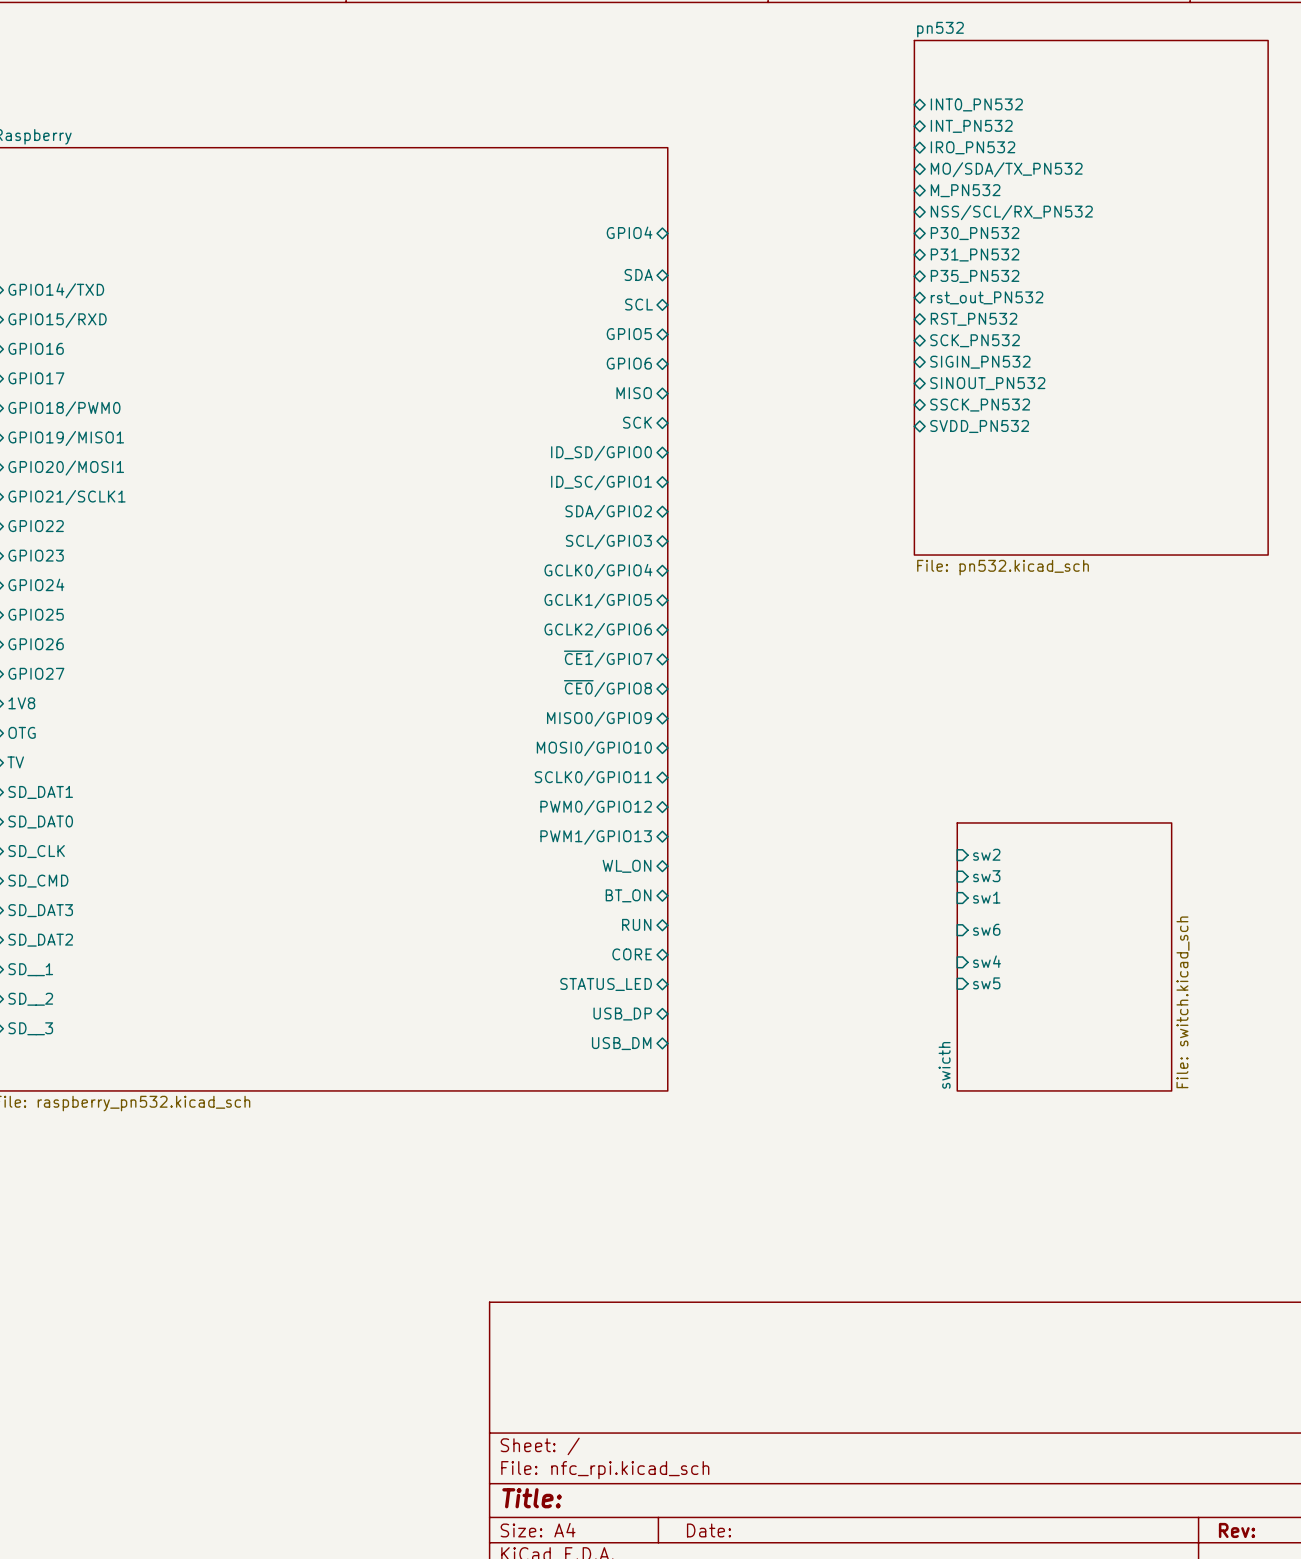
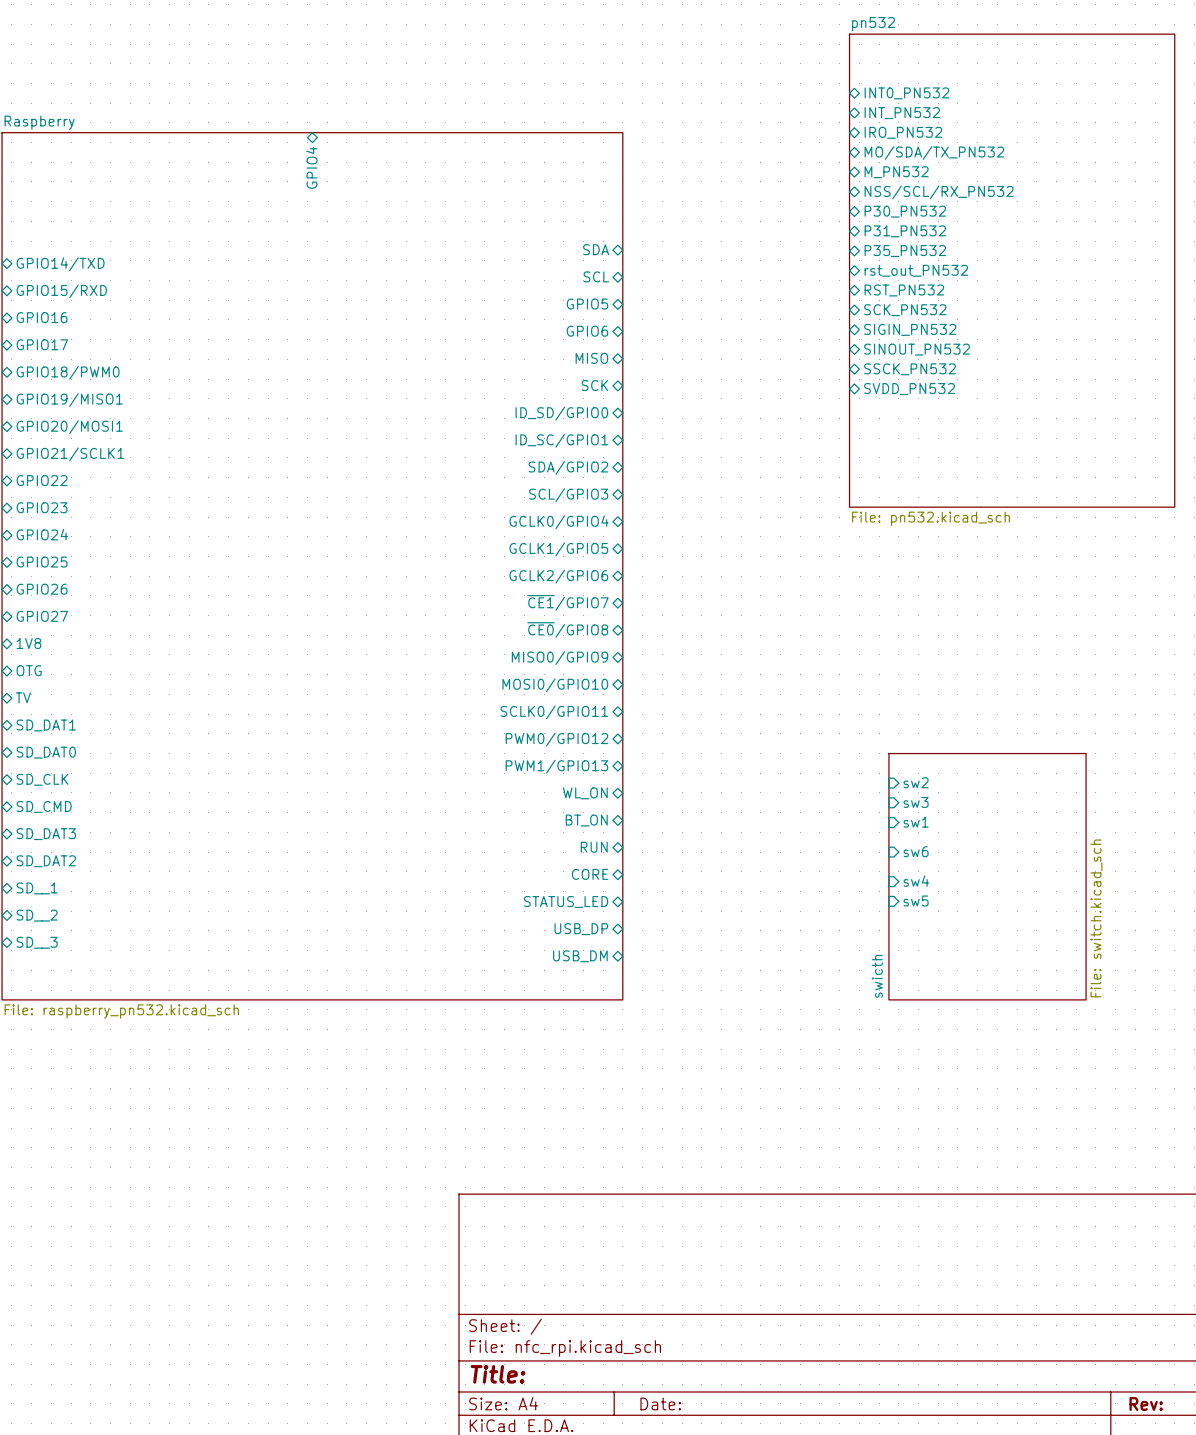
sheet pin: none -> GPIO4 (311, 167)
sheet pin: GPIO4 (629, 232) -> none

